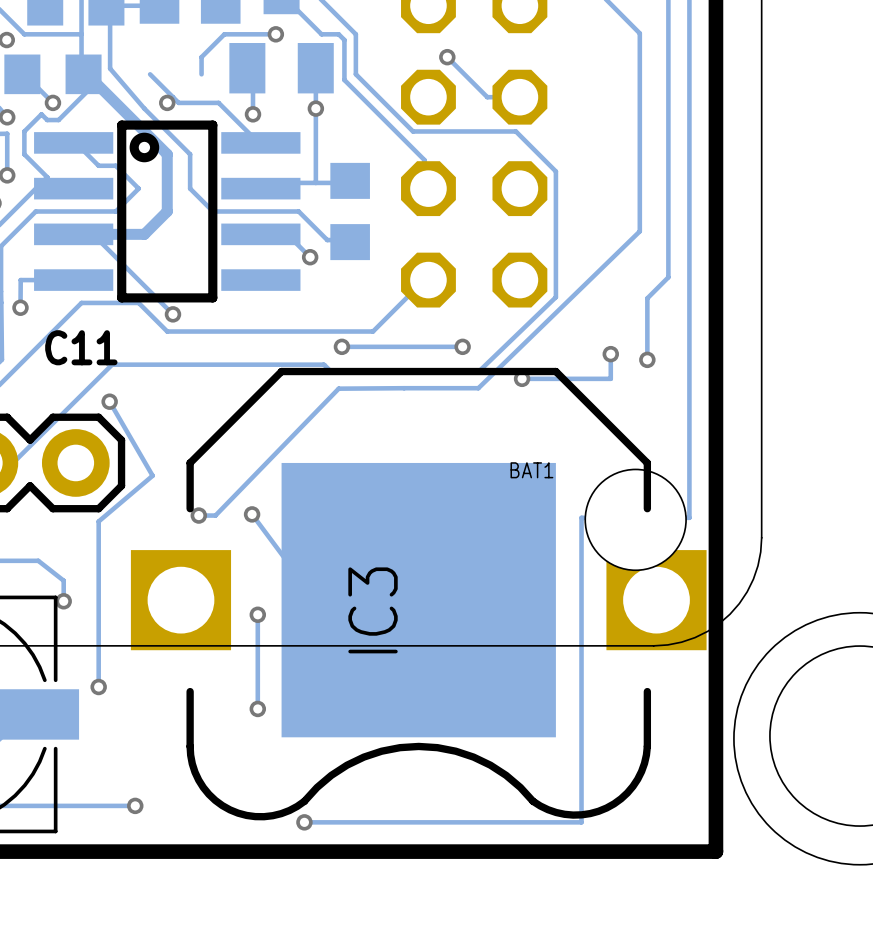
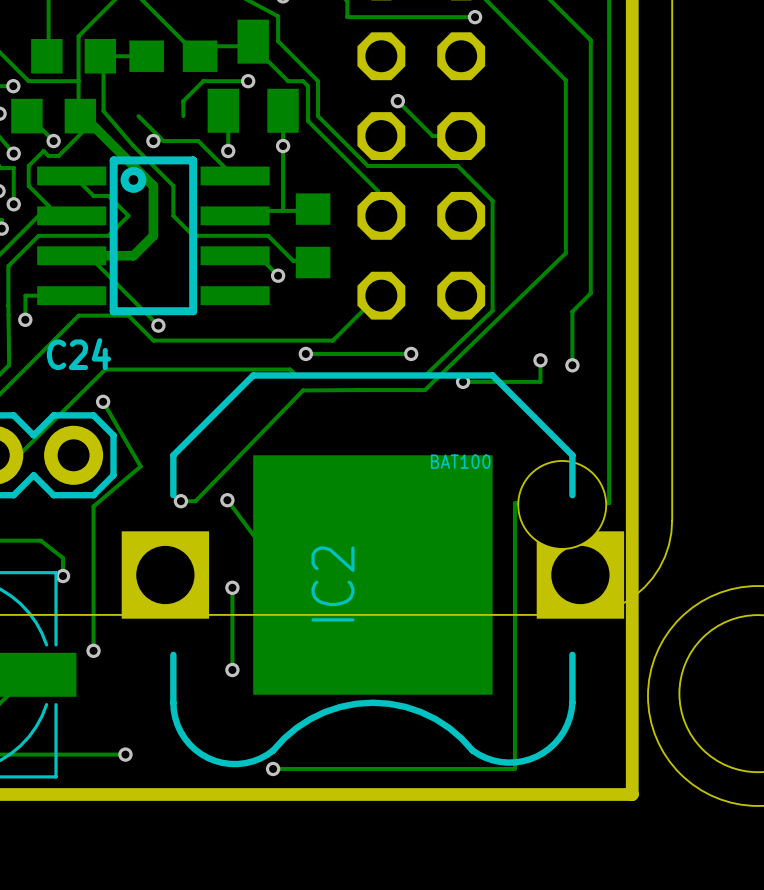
C11 name: C11 (81, 347) -> C24 (78, 354)
BAT1 name: BAT1 (531, 470) -> BAT100 (460, 461)
IC3 name: IC3 (373, 610) -> IC2 (332, 583)

